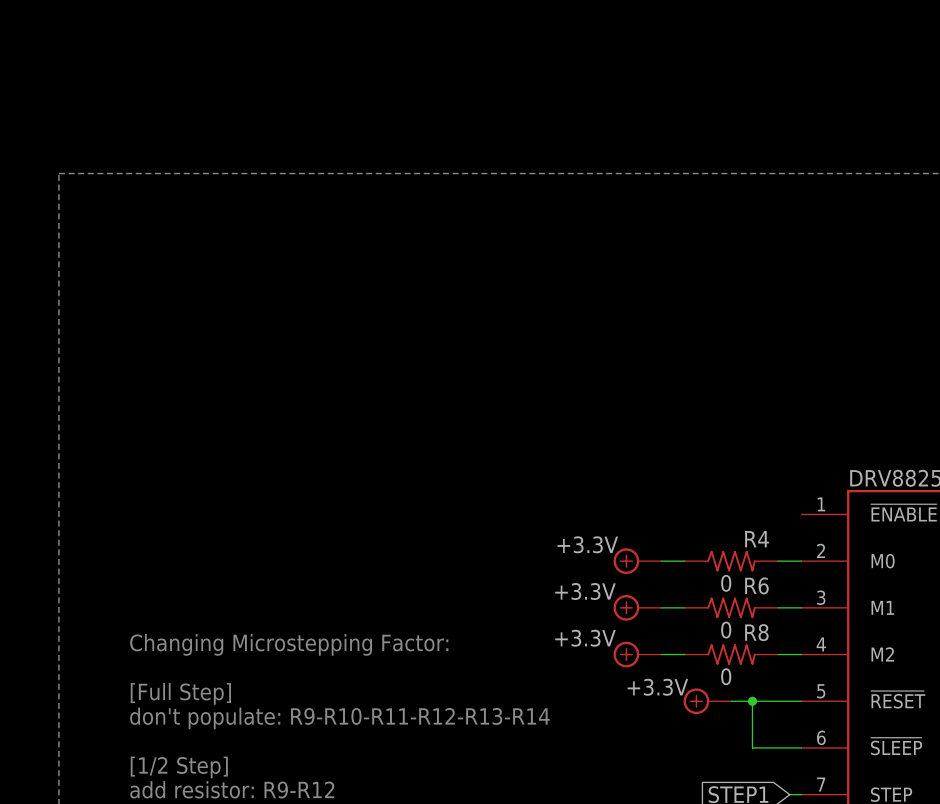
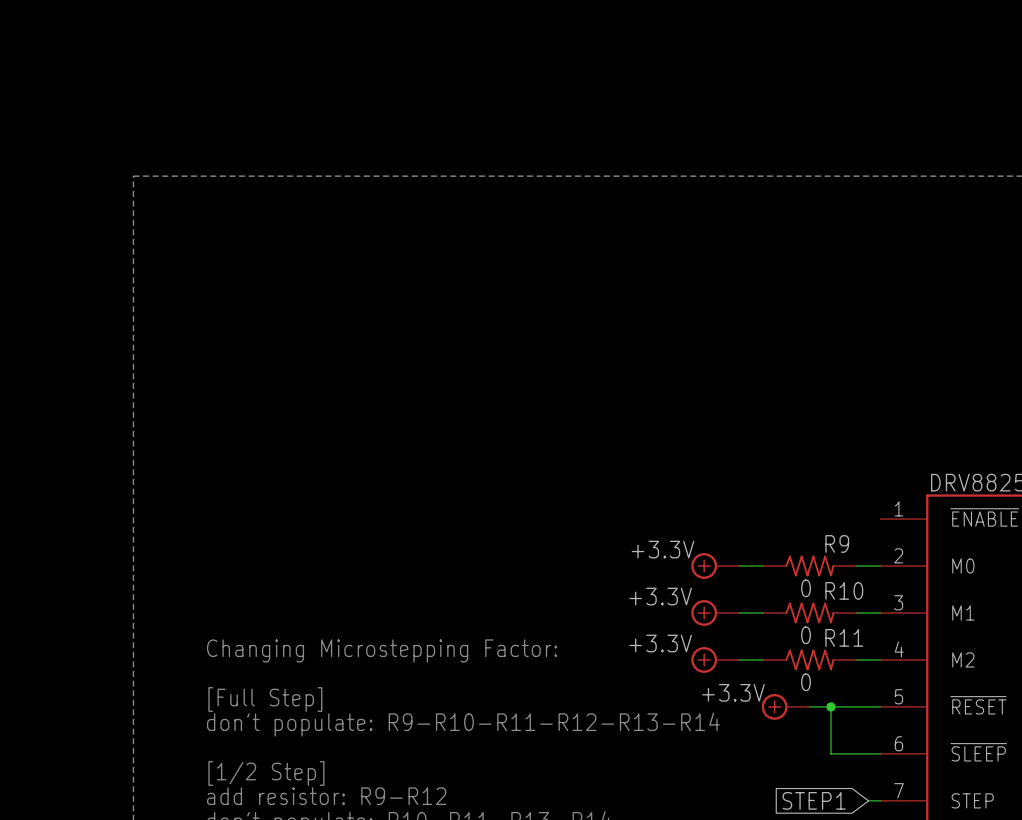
R4 name: R4 (756, 539) -> R9 (837, 543)
R6 name: R6 (756, 585) -> R10 (844, 590)
R8 name: R8 (756, 632) -> R11 (844, 637)

